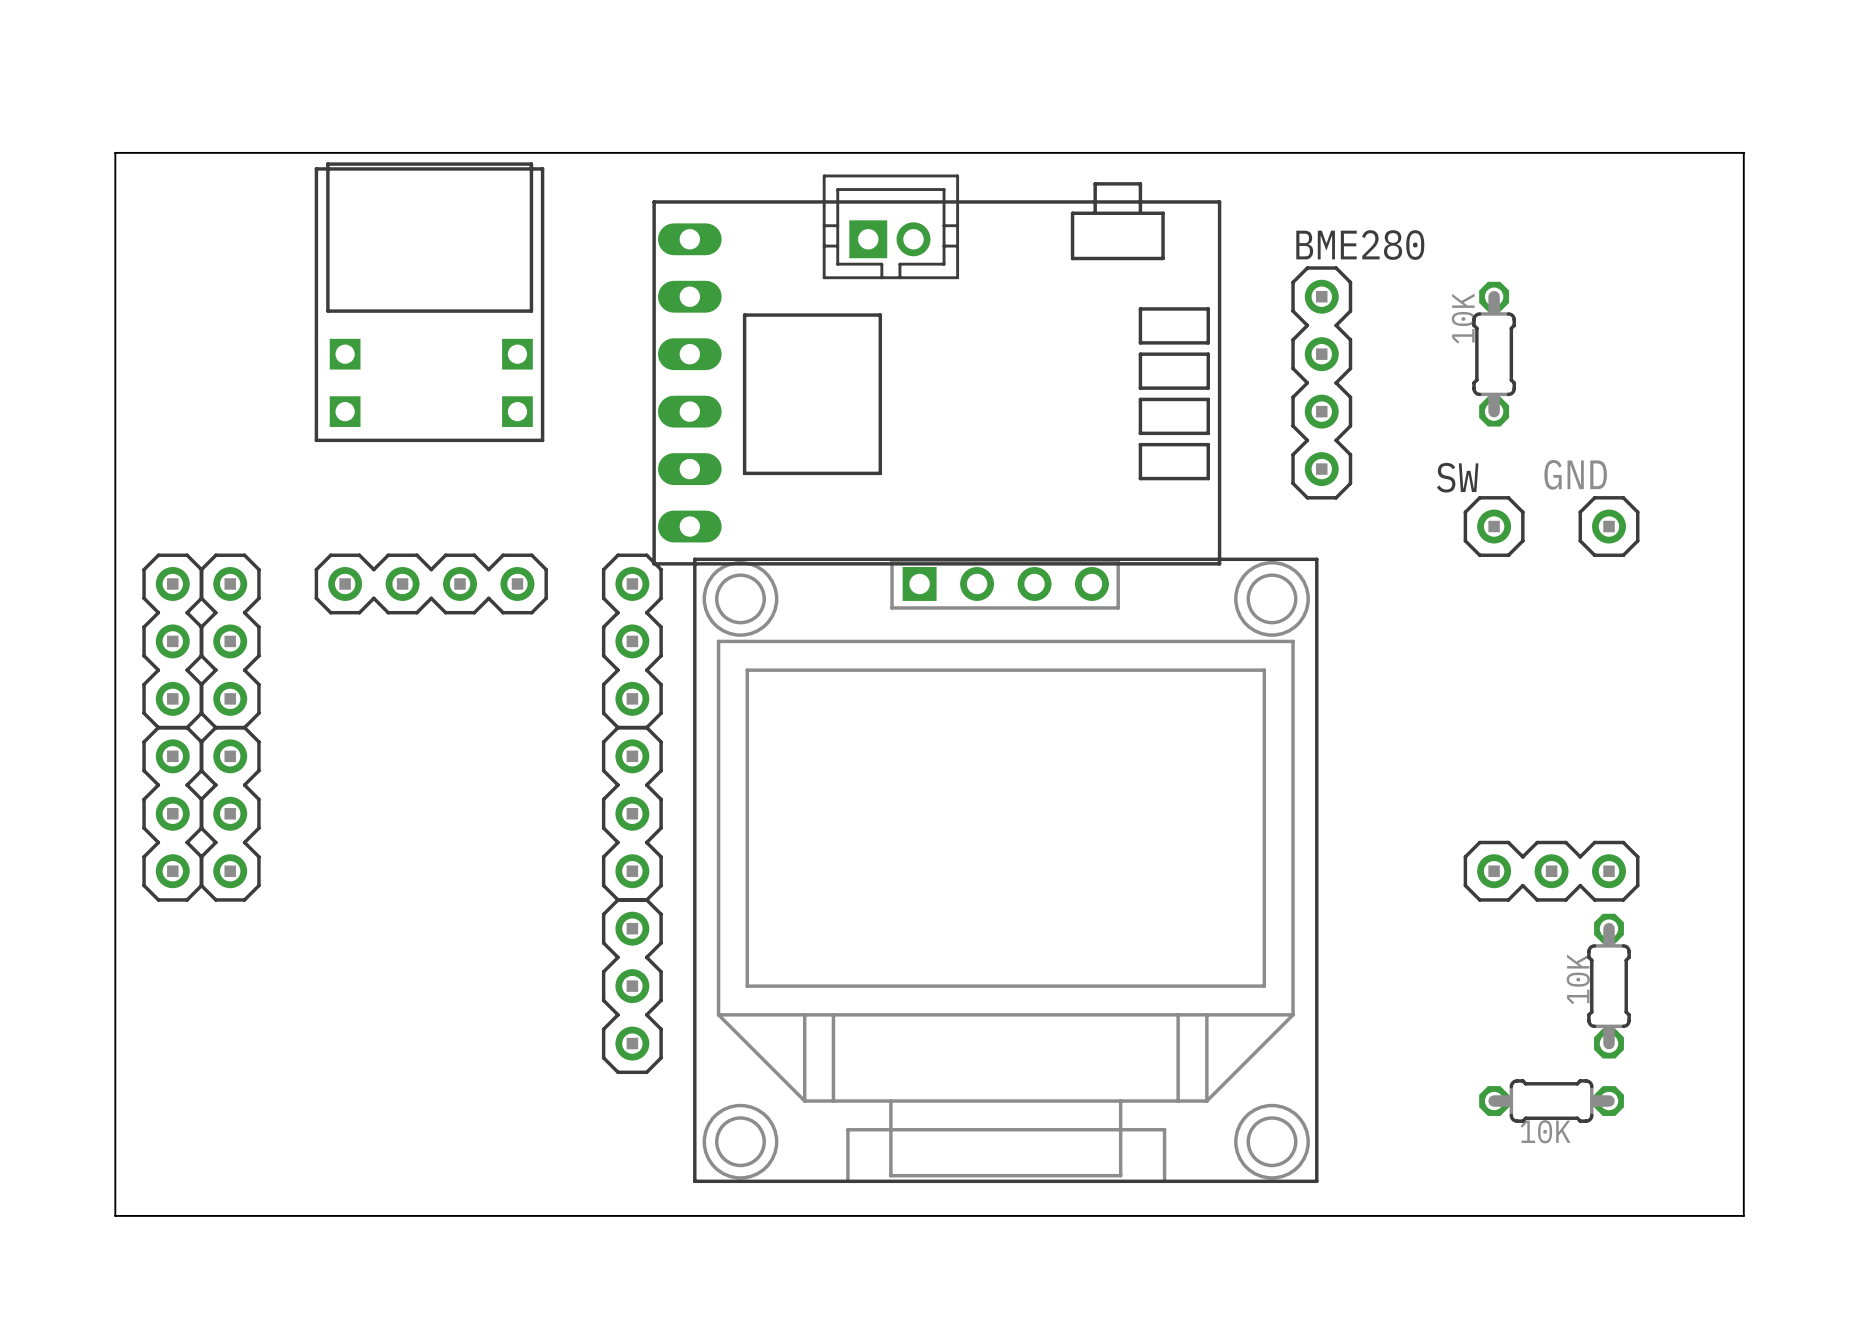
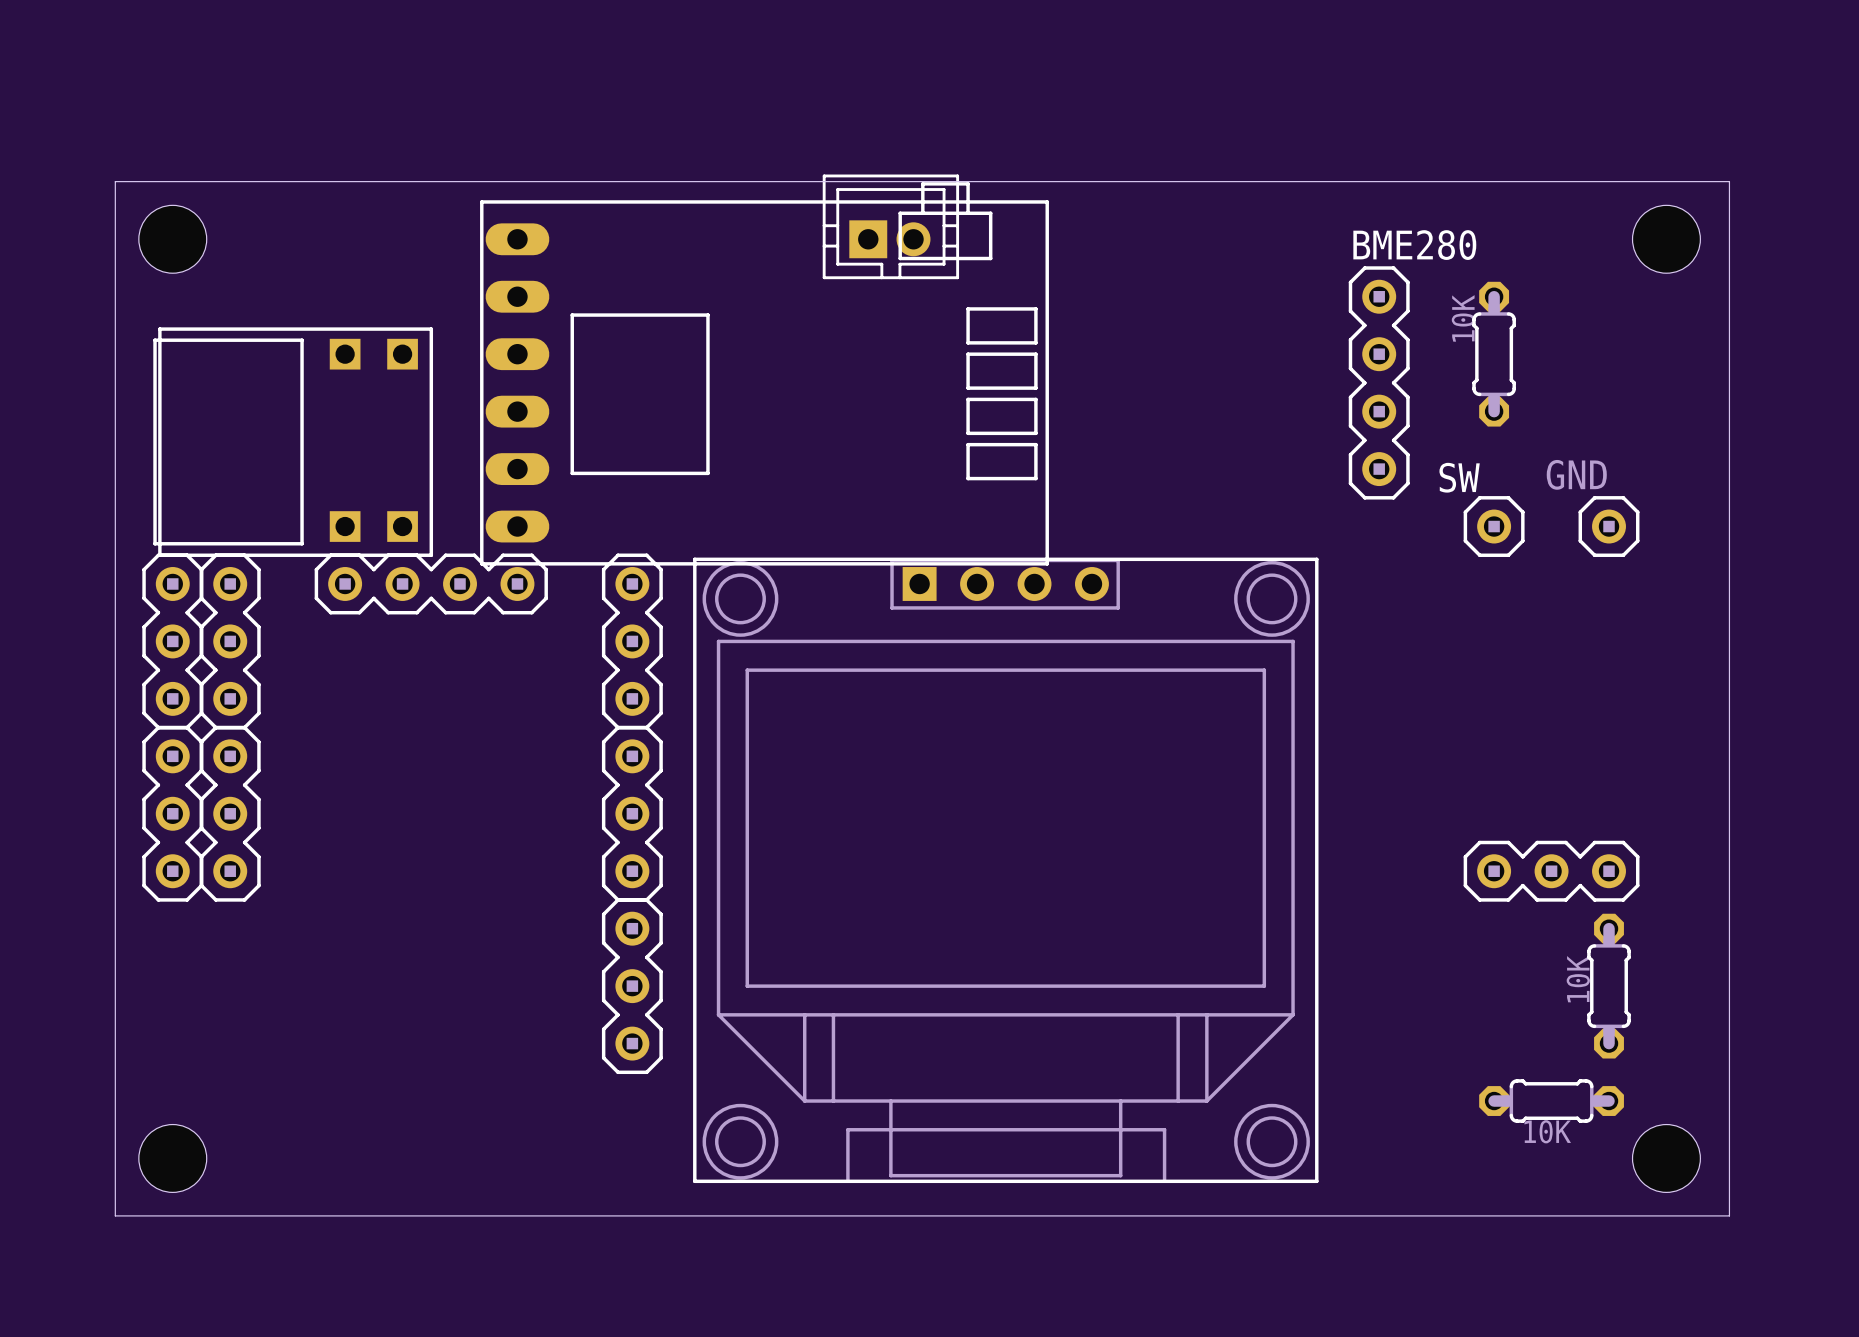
board edge: (115, 181) (115, 152) (1743, 152) (1743, 1215) (1729, 1215) -> (115, 181) (1729, 181) (1729, 1215)
hole: none -> (172, 239)
hole: none -> (1666, 239)
part rotation: 0° (429, 302) -> 90° counterclockwise (293, 442)
part position: (429, 302) -> (293, 442)
part position: (936, 373) -> (764, 373)
BME280 position: (1321, 382) -> (1379, 382)
hole: none -> (172, 1158)
hole: none -> (1666, 1158)

